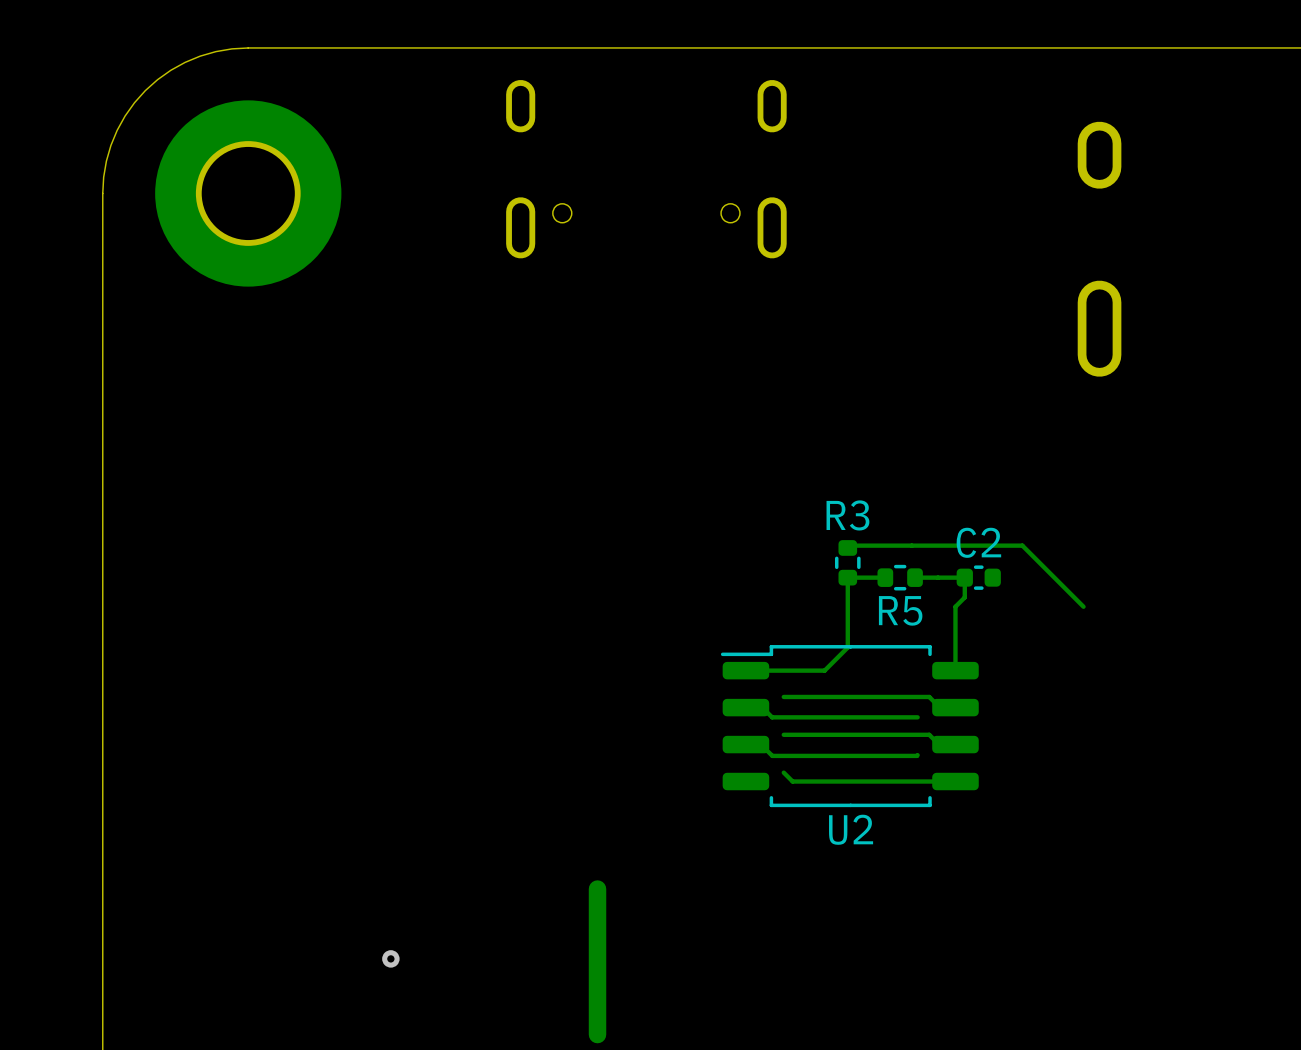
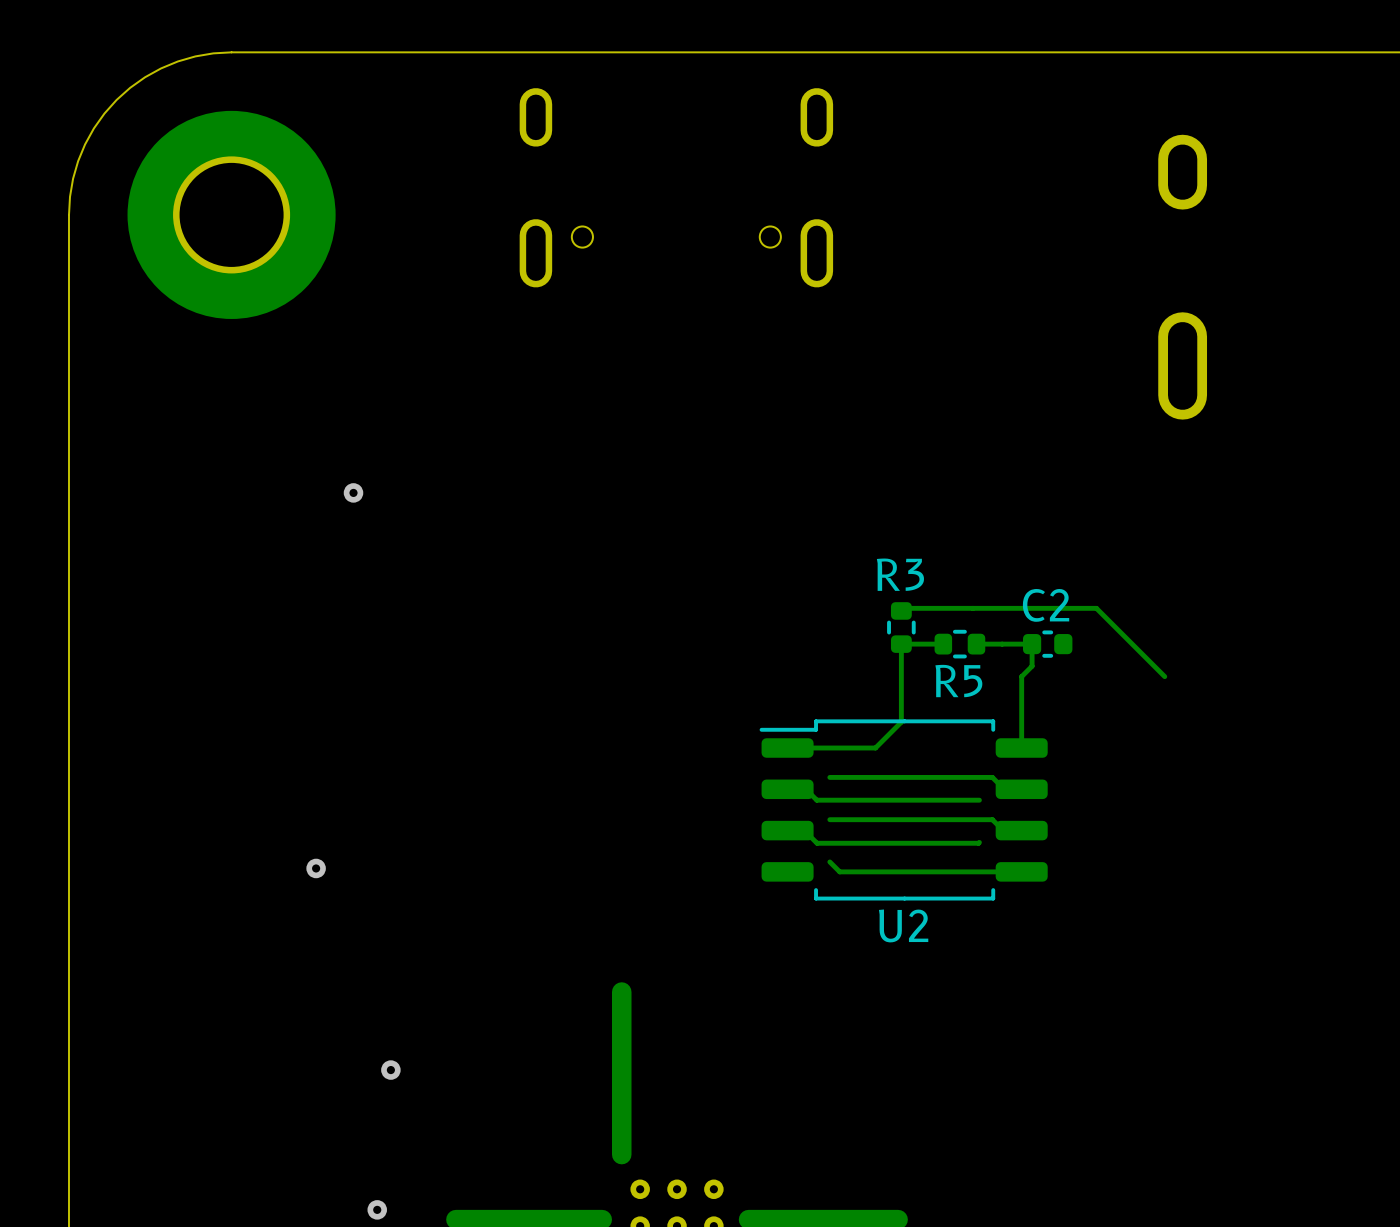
via: none -> (353, 492)
via: none -> (316, 868)

